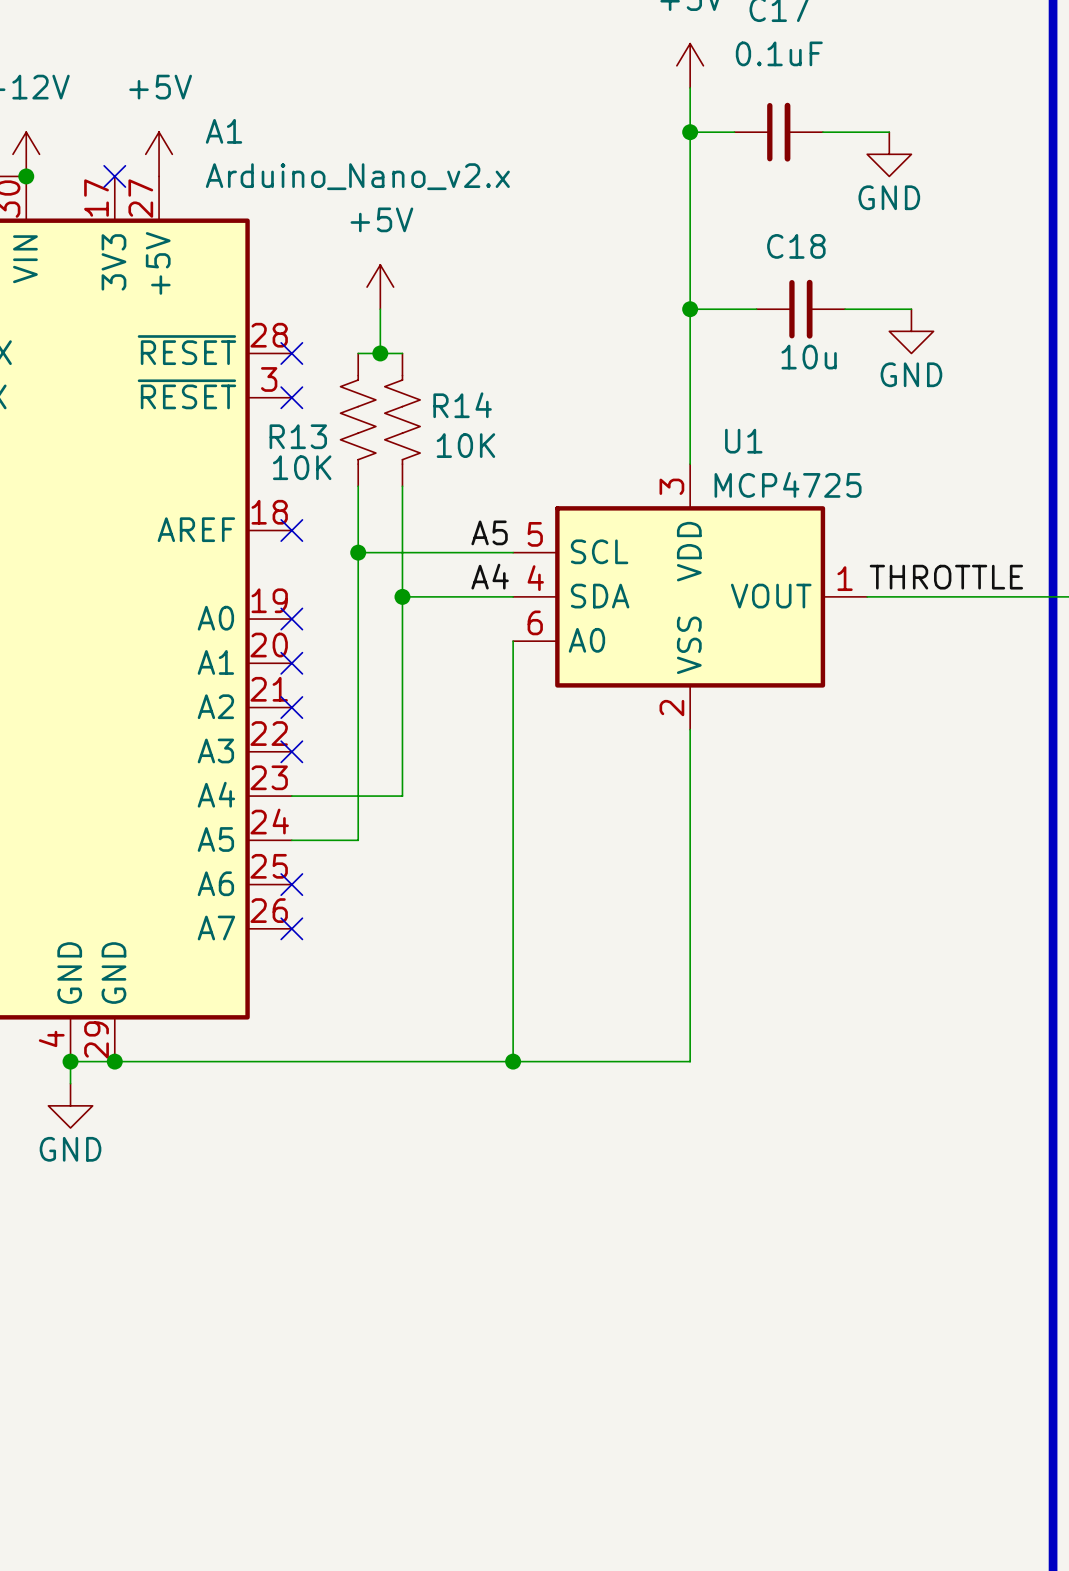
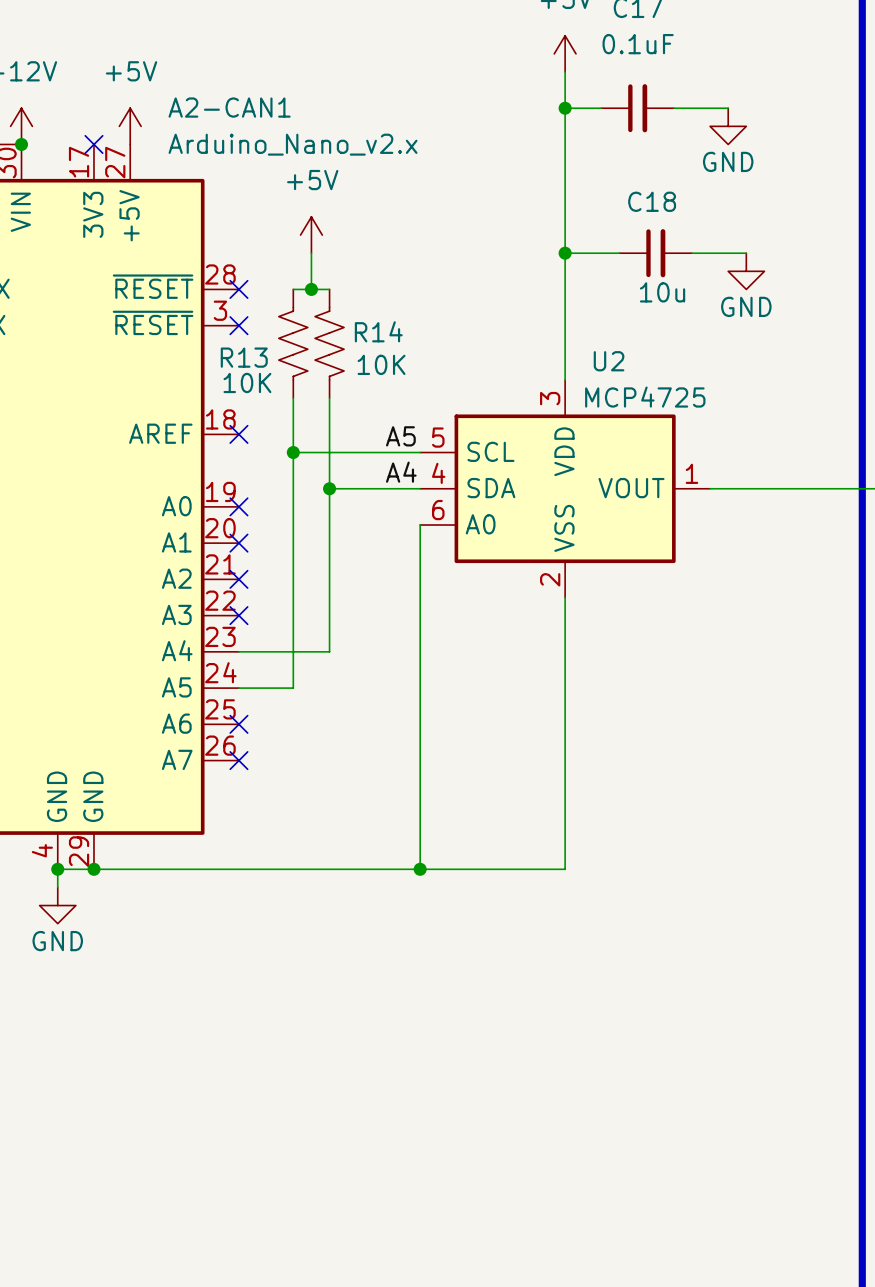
A1 name: A1 (224, 131) -> A2-CAN1 (229, 107)
U1 name: U1 (743, 441) -> U2 (609, 361)
label: THROTTLE (946, 577) -> none

